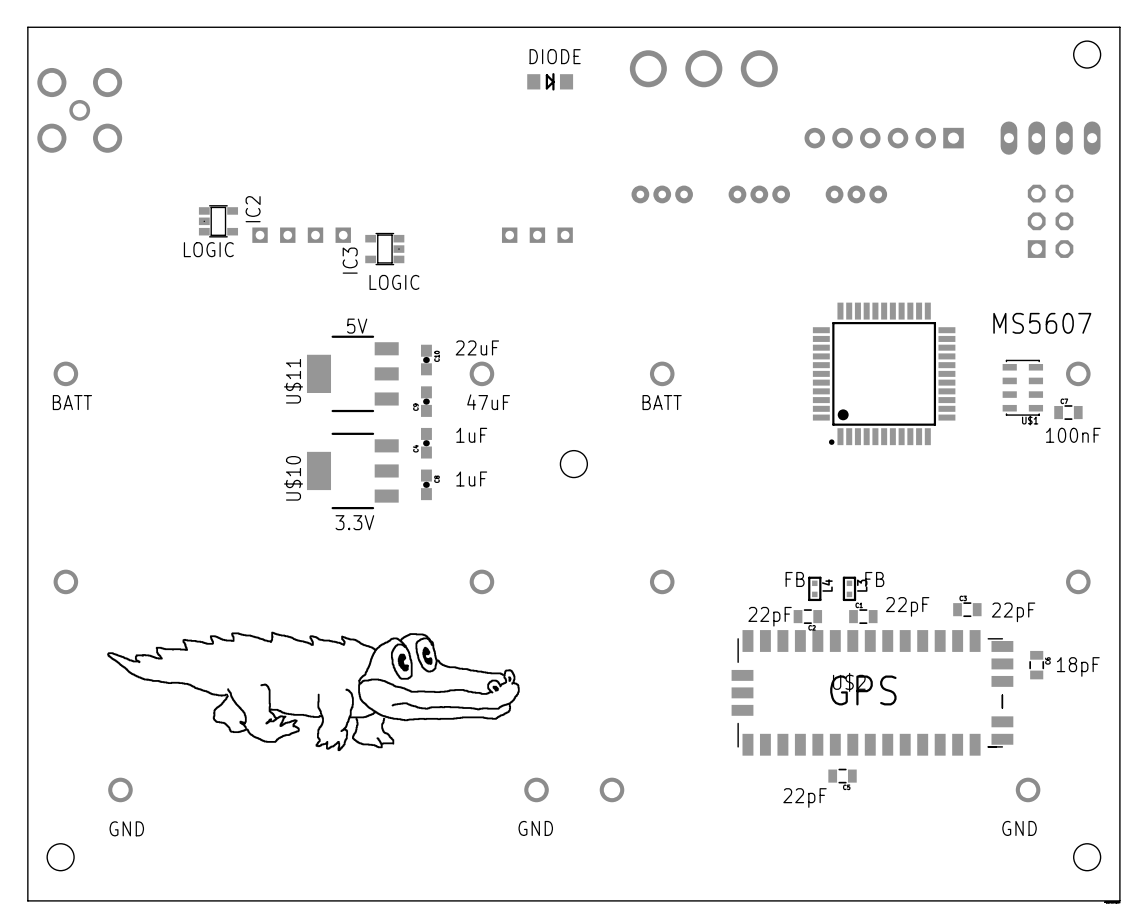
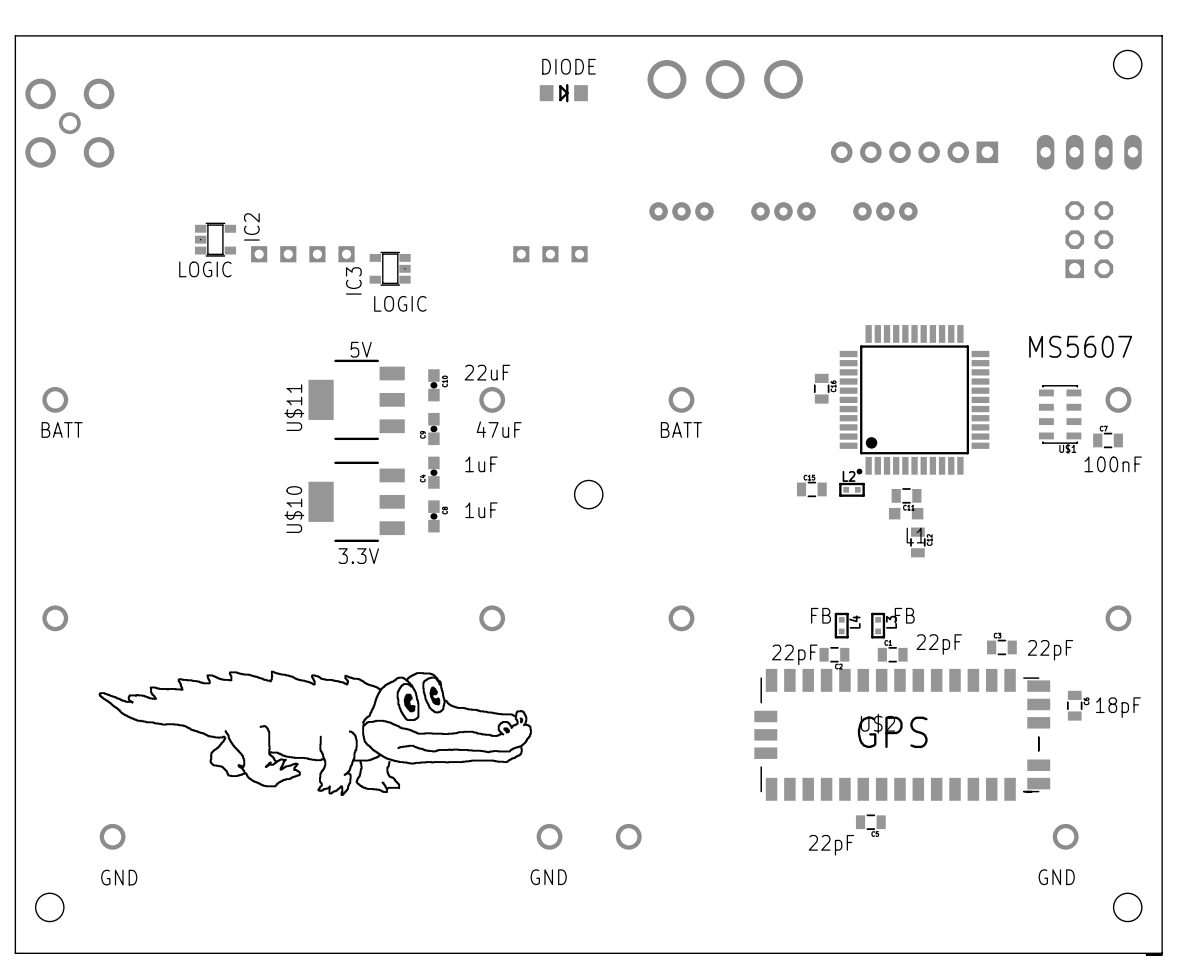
part: none -> (821, 388)
part: none -> (811, 489)
L2: none -> (852, 489)
part: none -> (906, 495)
L1: none -> (906, 513)
part: none -> (917, 542)

